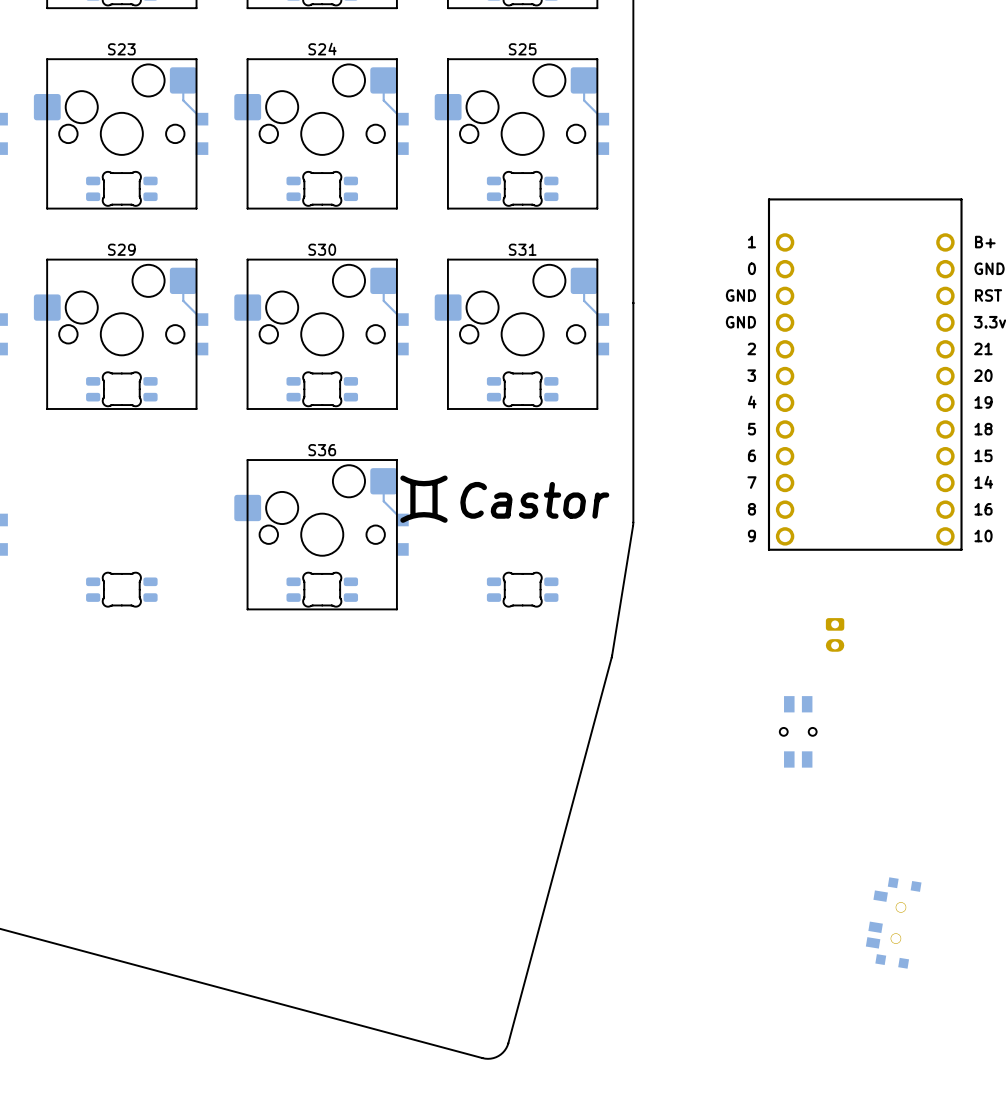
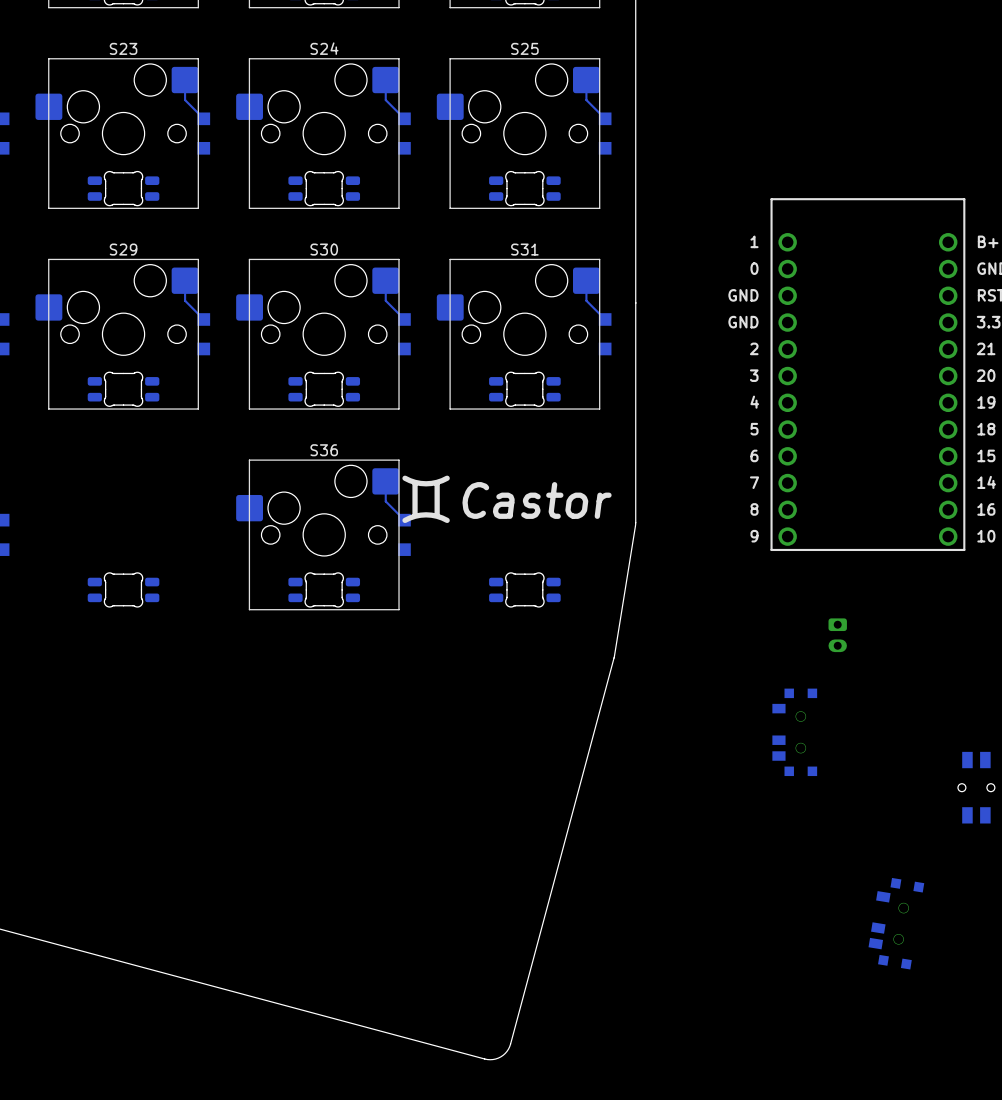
part footprint: [779, 696, 817, 768] -> [772, 688, 818, 777]
part: none -> (976, 787)

